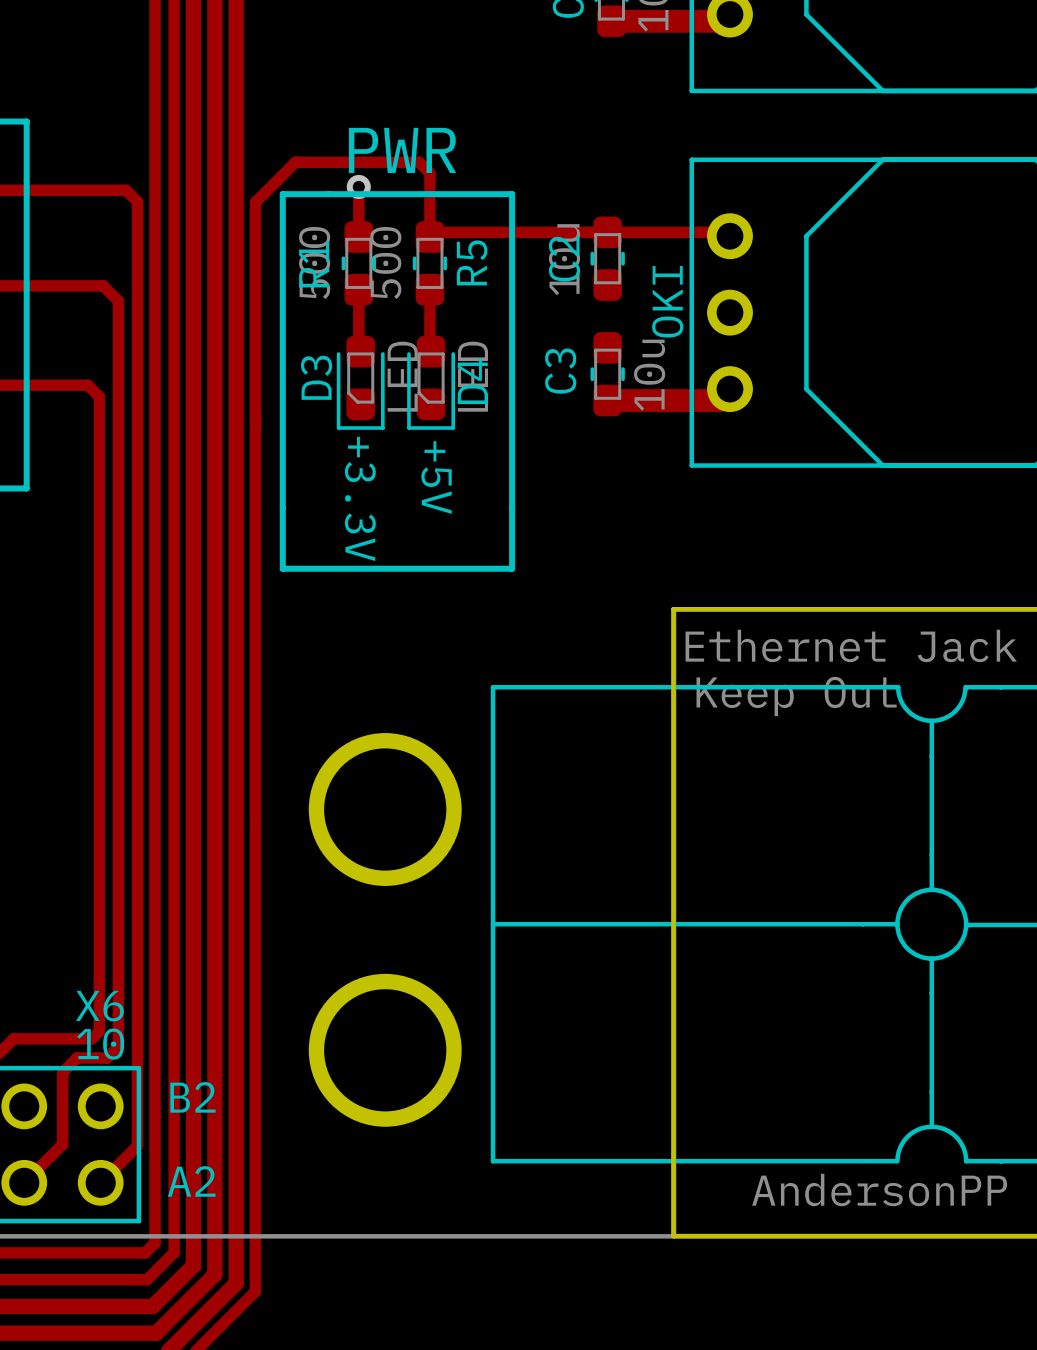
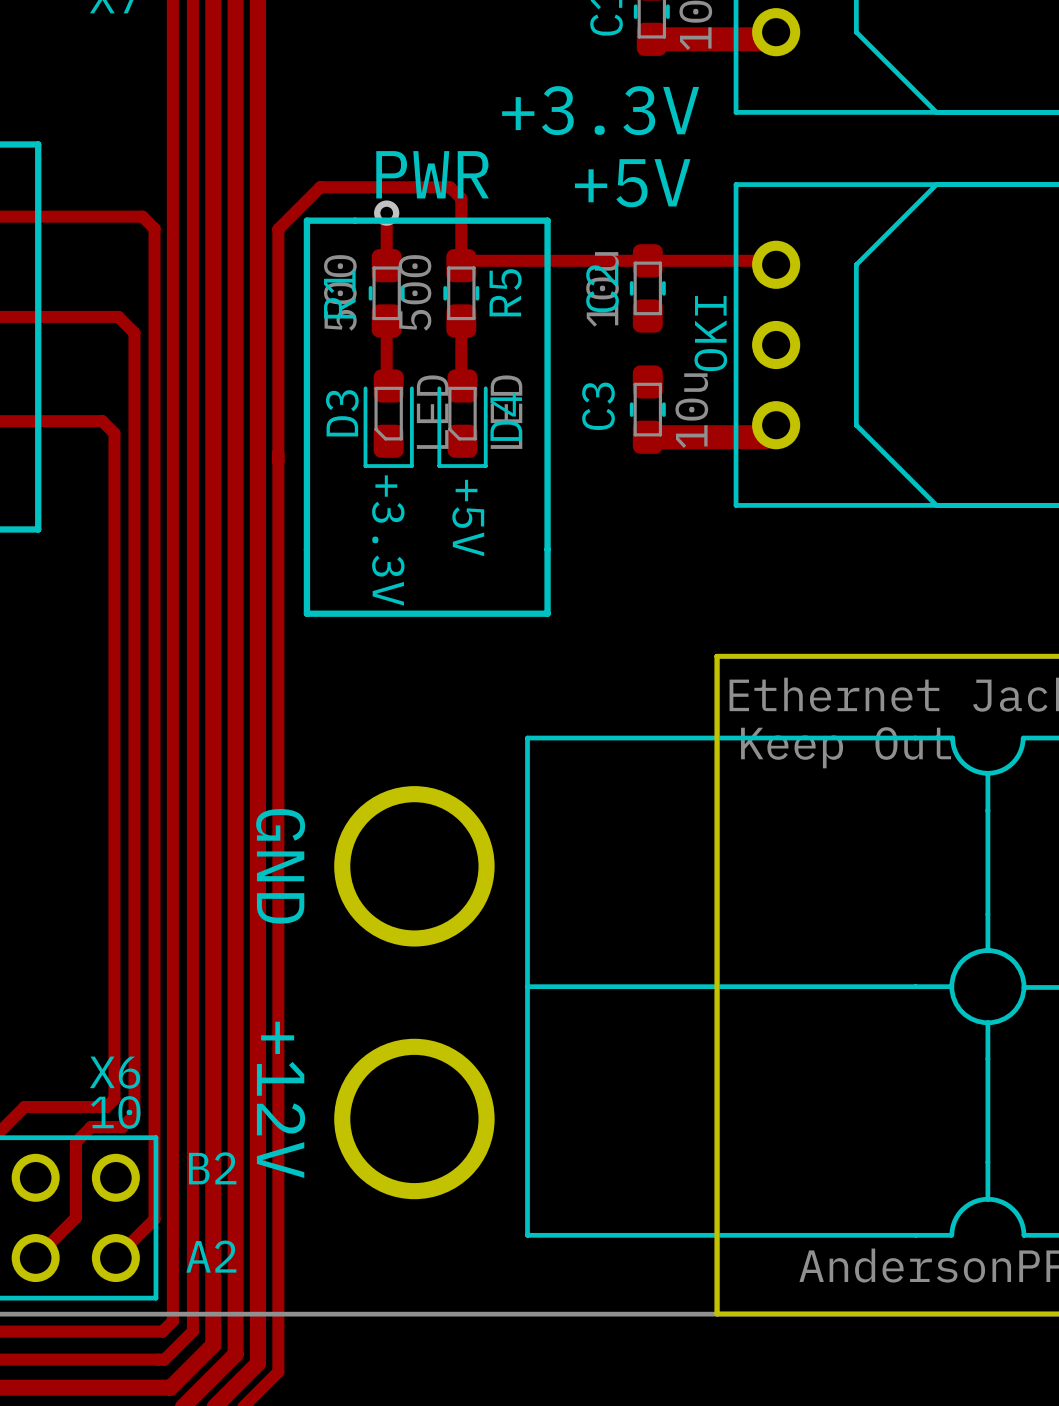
text: none -> +3.3V (600, 110)
text: none -> +5V (632, 183)
text: none -> GND (280, 866)
text: none -> +12V (281, 1099)

